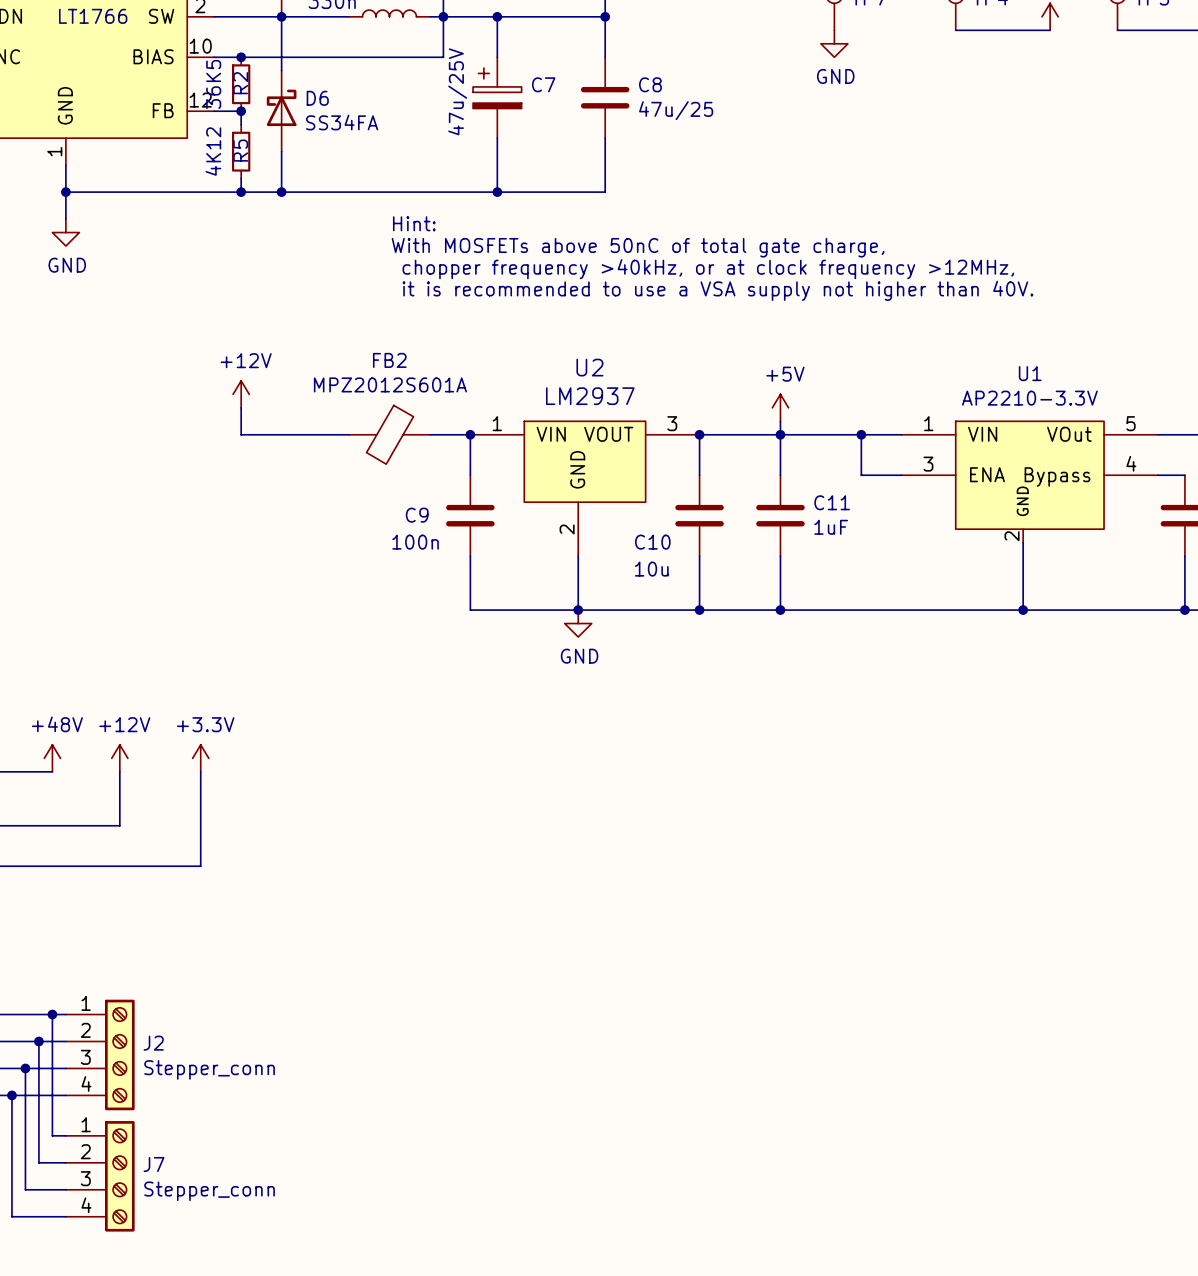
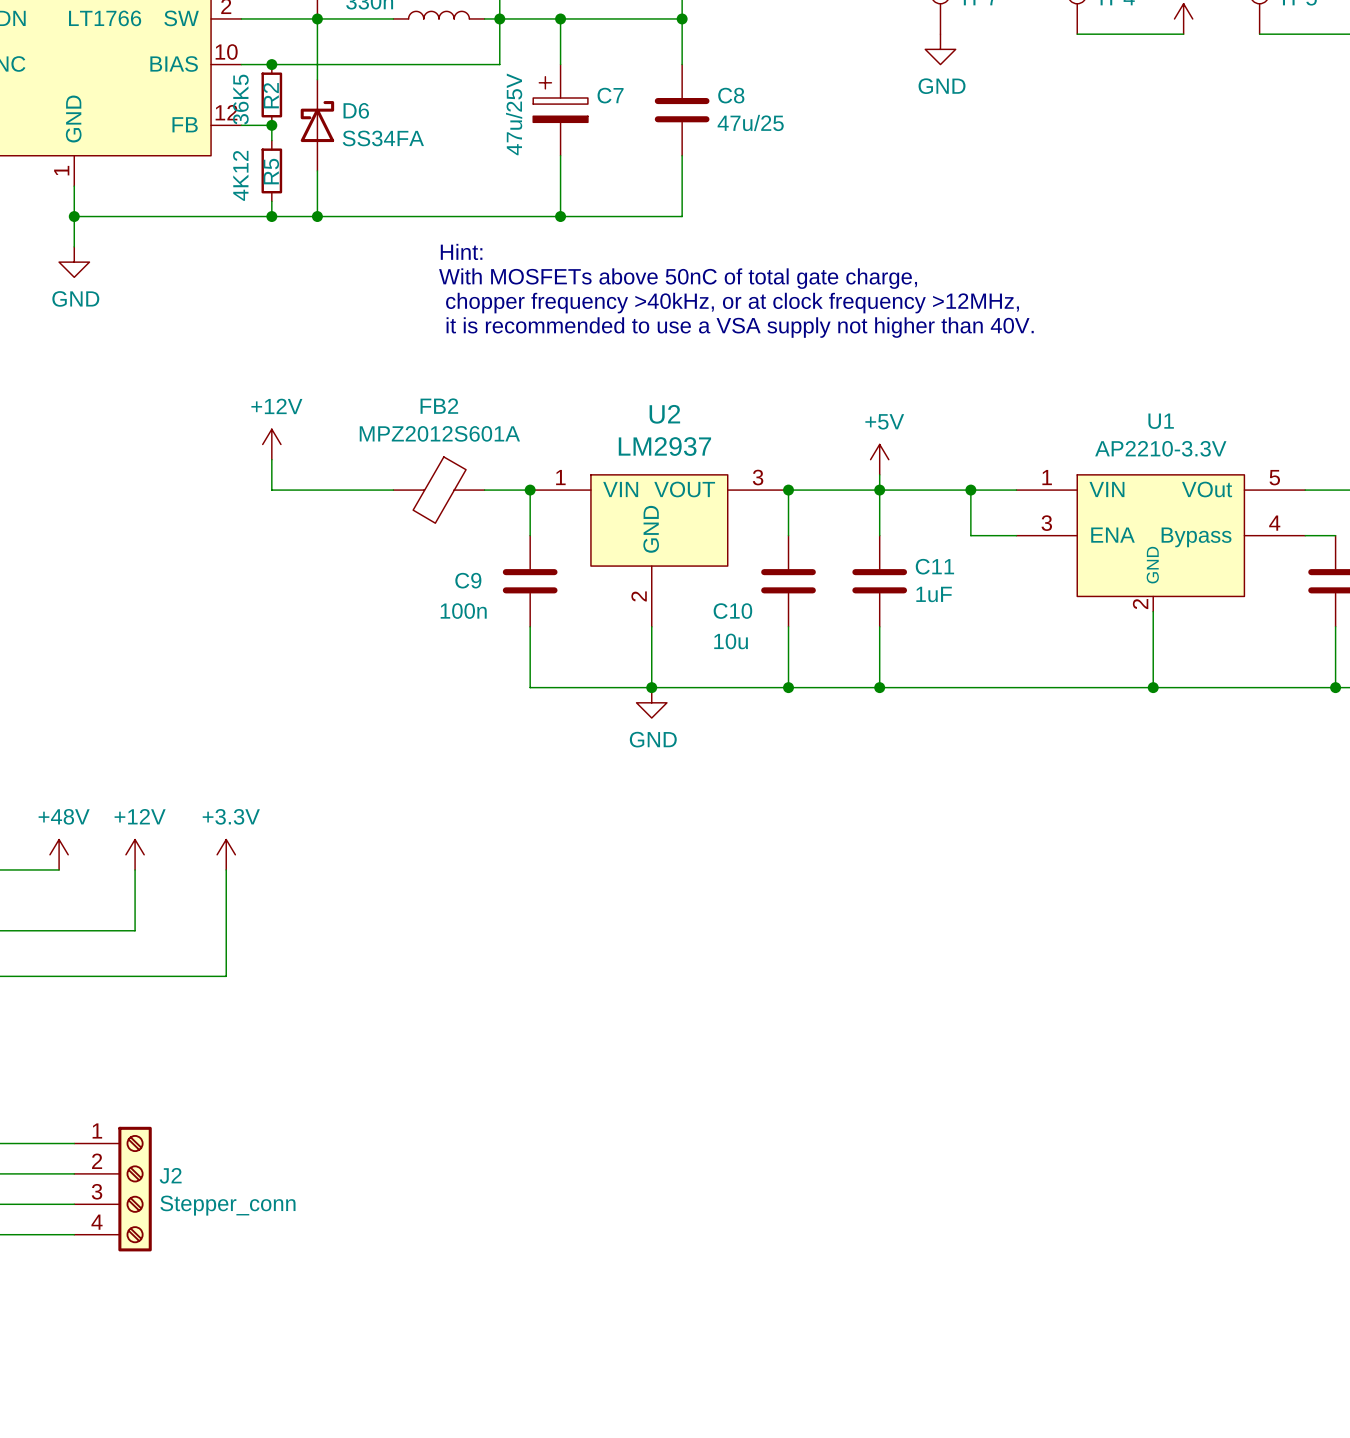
wire: (52, 1014) (52, 1135) (65, 1135) -> none
junction: (52, 1014) -> none
wire: (38, 1041) (38, 1162) (65, 1162) -> none
junction: (38, 1041) -> none
wire: (25, 1068) (25, 1189) (65, 1189) -> none
junction: (25, 1068) -> none
wire: (11, 1095) (11, 1216) (65, 1216) -> none
junction: (11, 1095) -> none
J7: Stepper_conn (100, 1176) -> none

